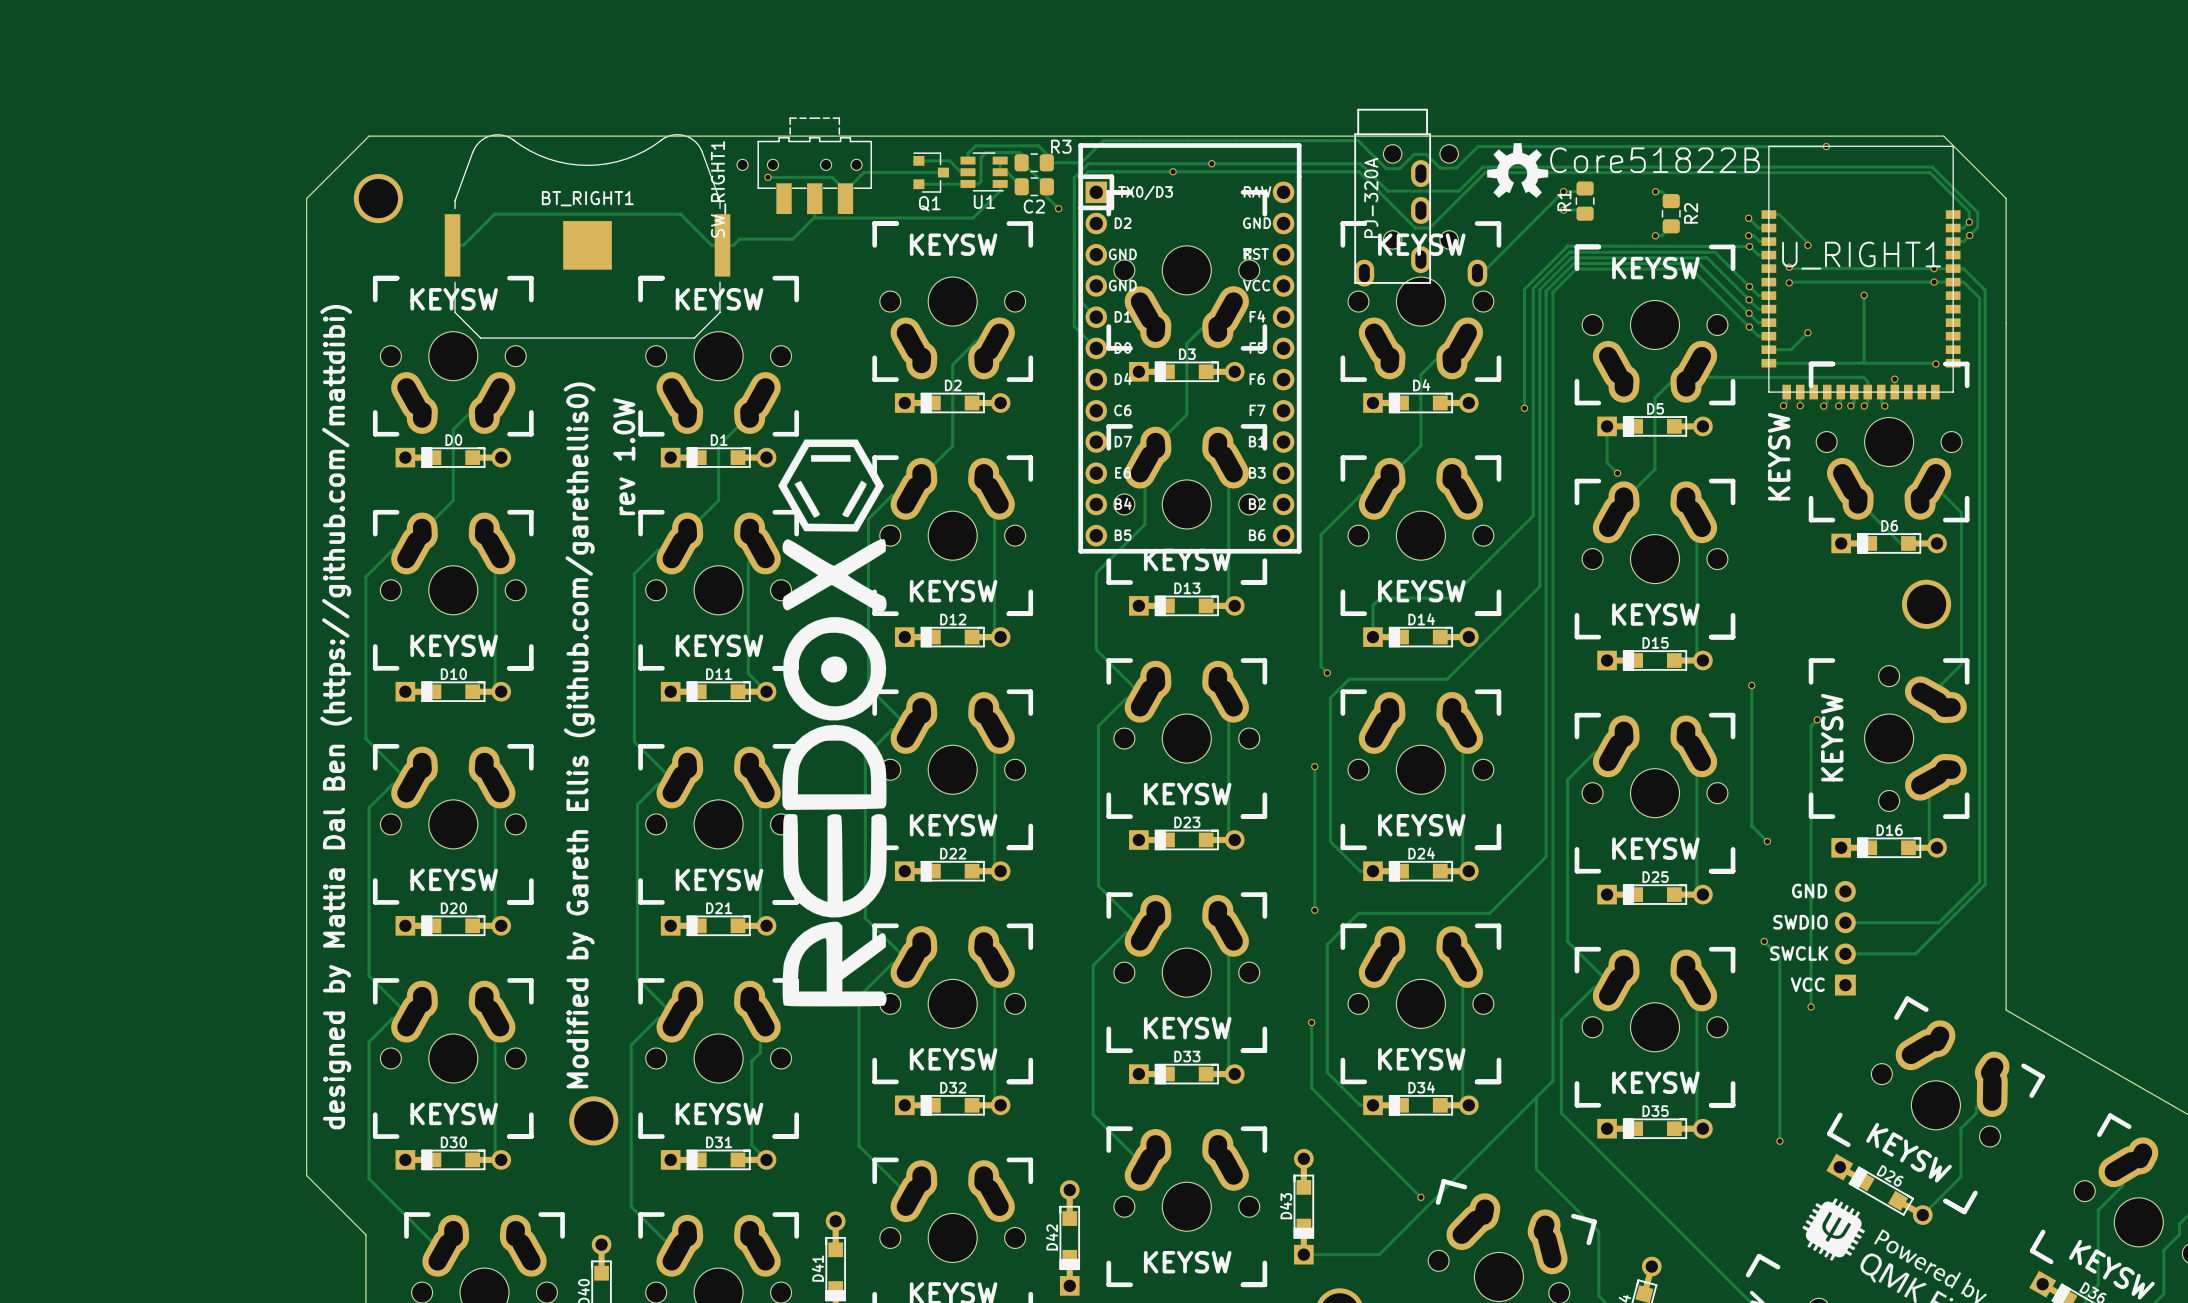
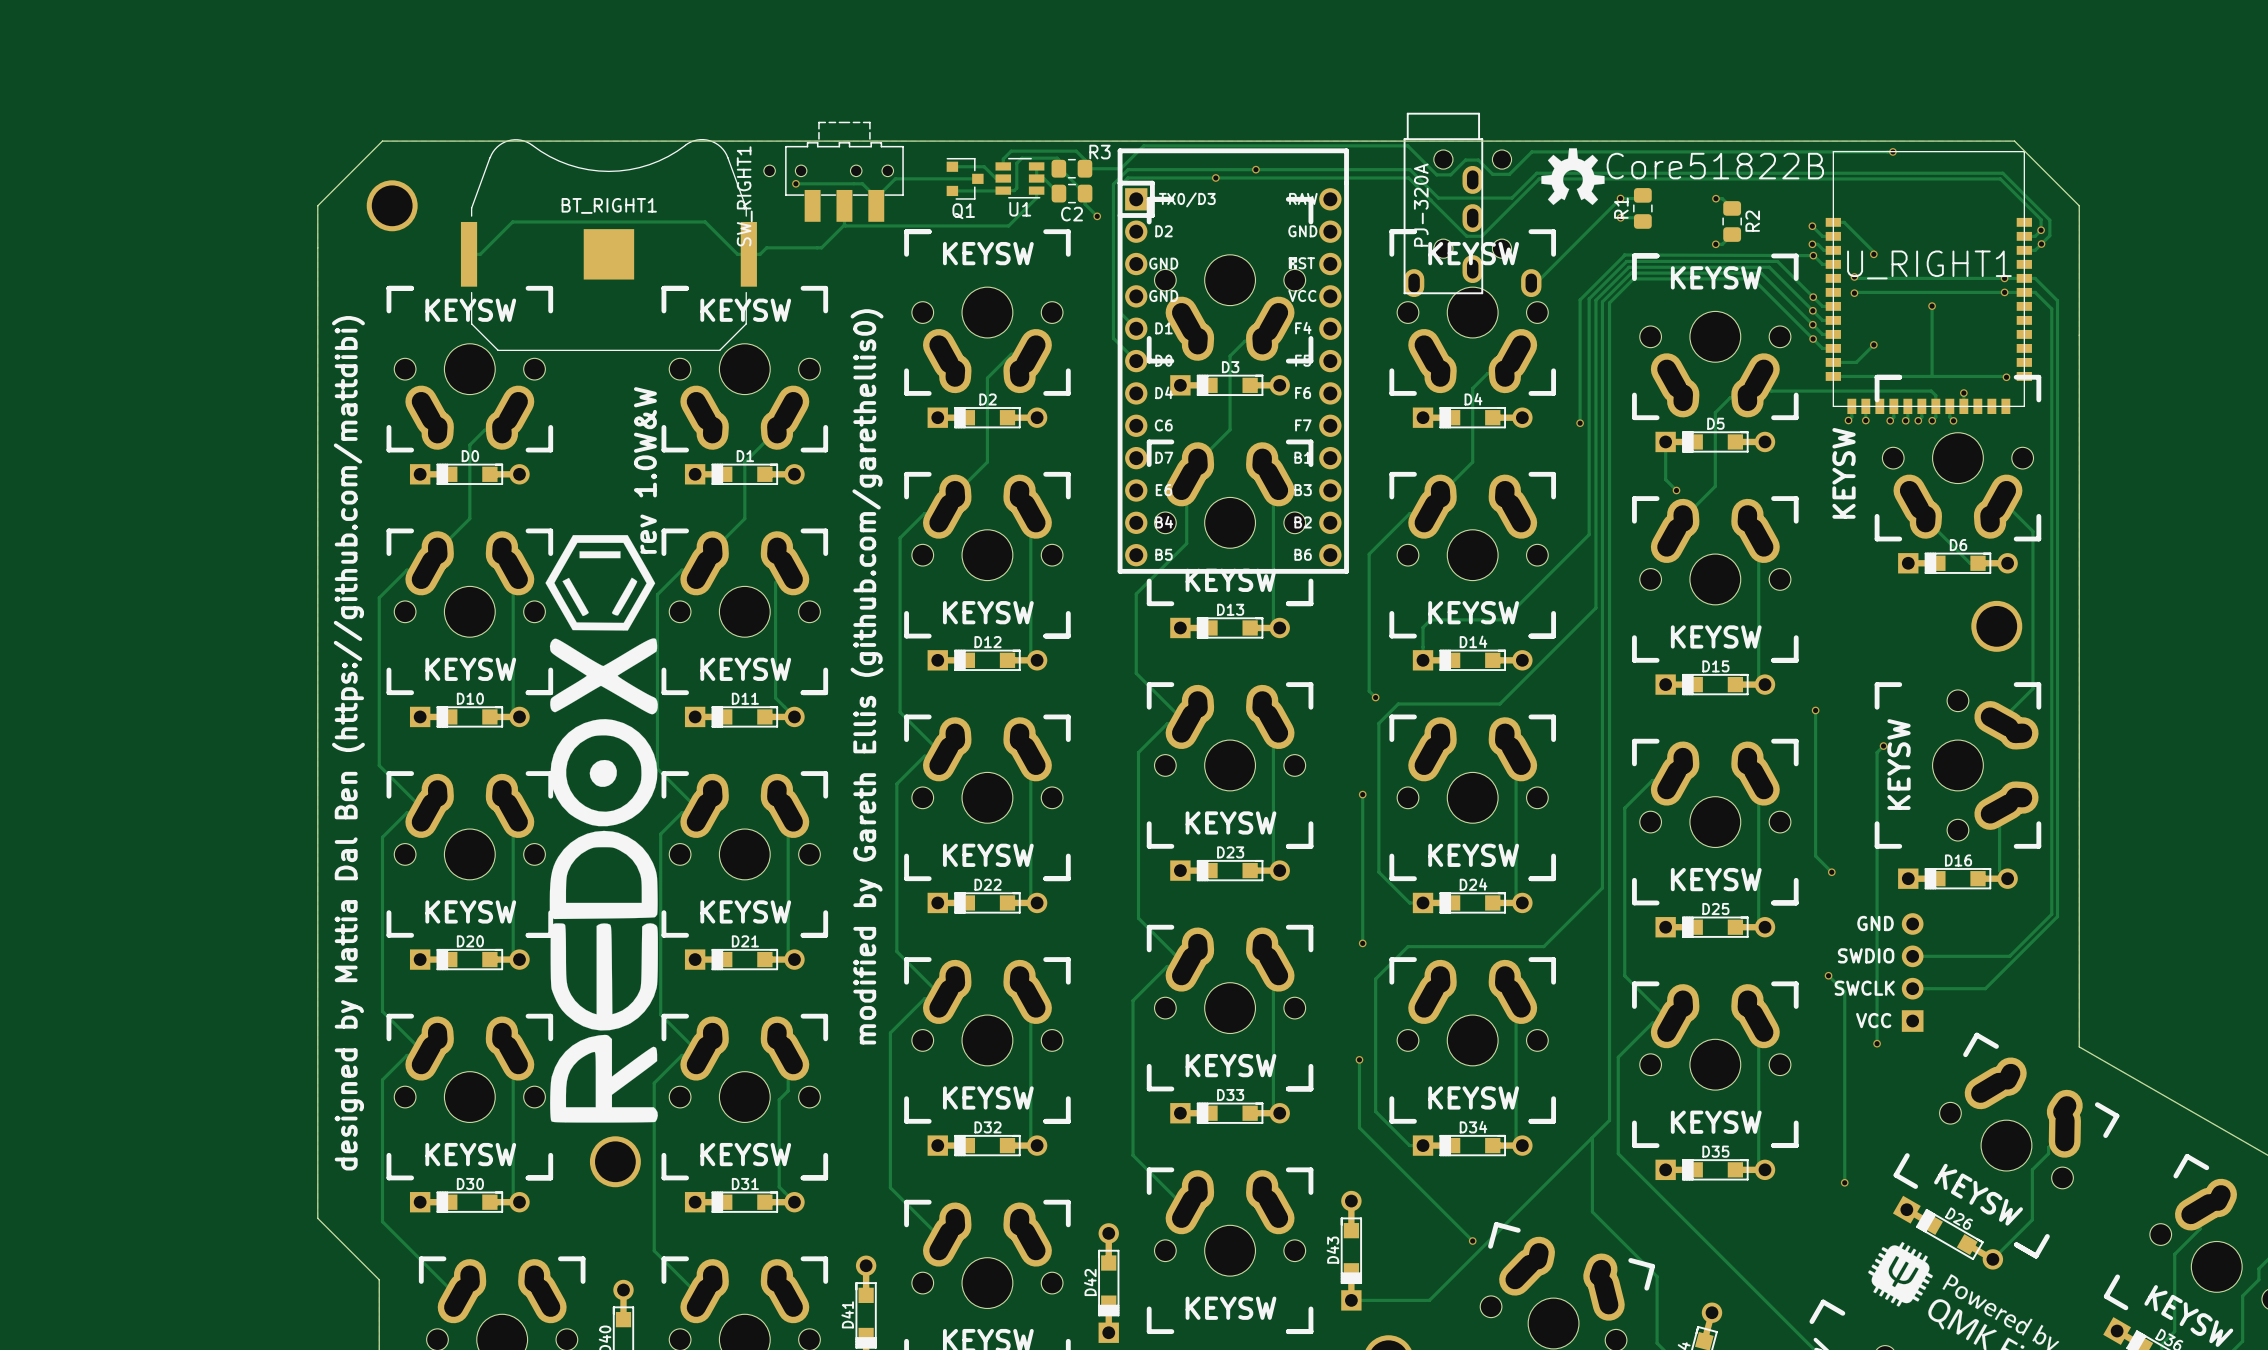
text: rev 1.0W (624, 456) -> rev 1.0W&W (645, 470)
text: none -> modified by Gareth Ellis (github.com/garethellis0) (867, 676)
drawing position: (832, 722) -> (601, 828)
text: Modified by Gareth Ellis (github.com/garethellis0) (579, 735) -> none

